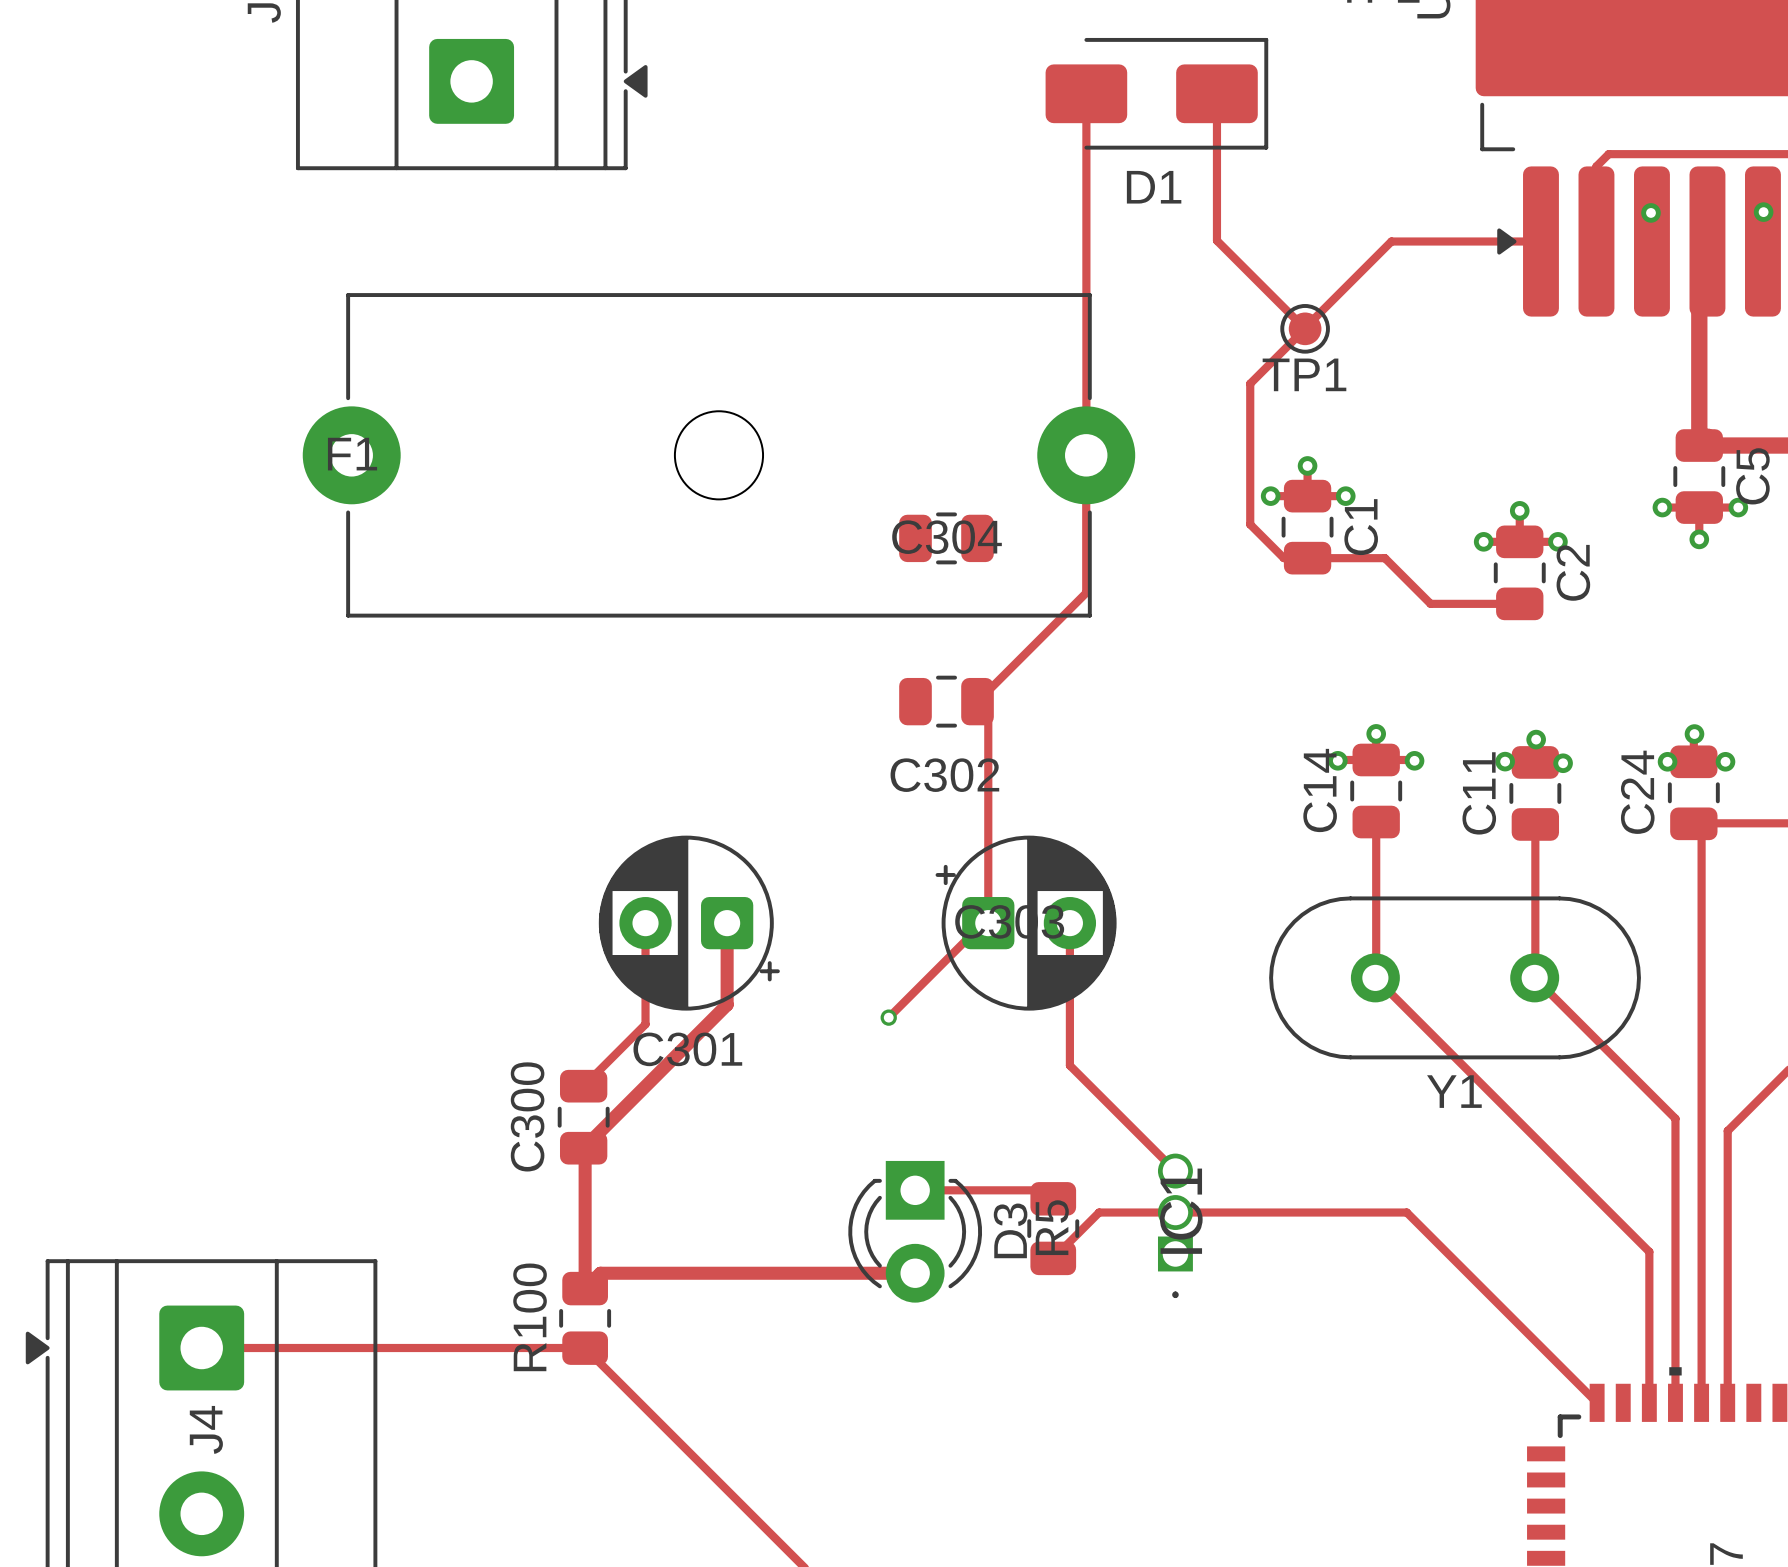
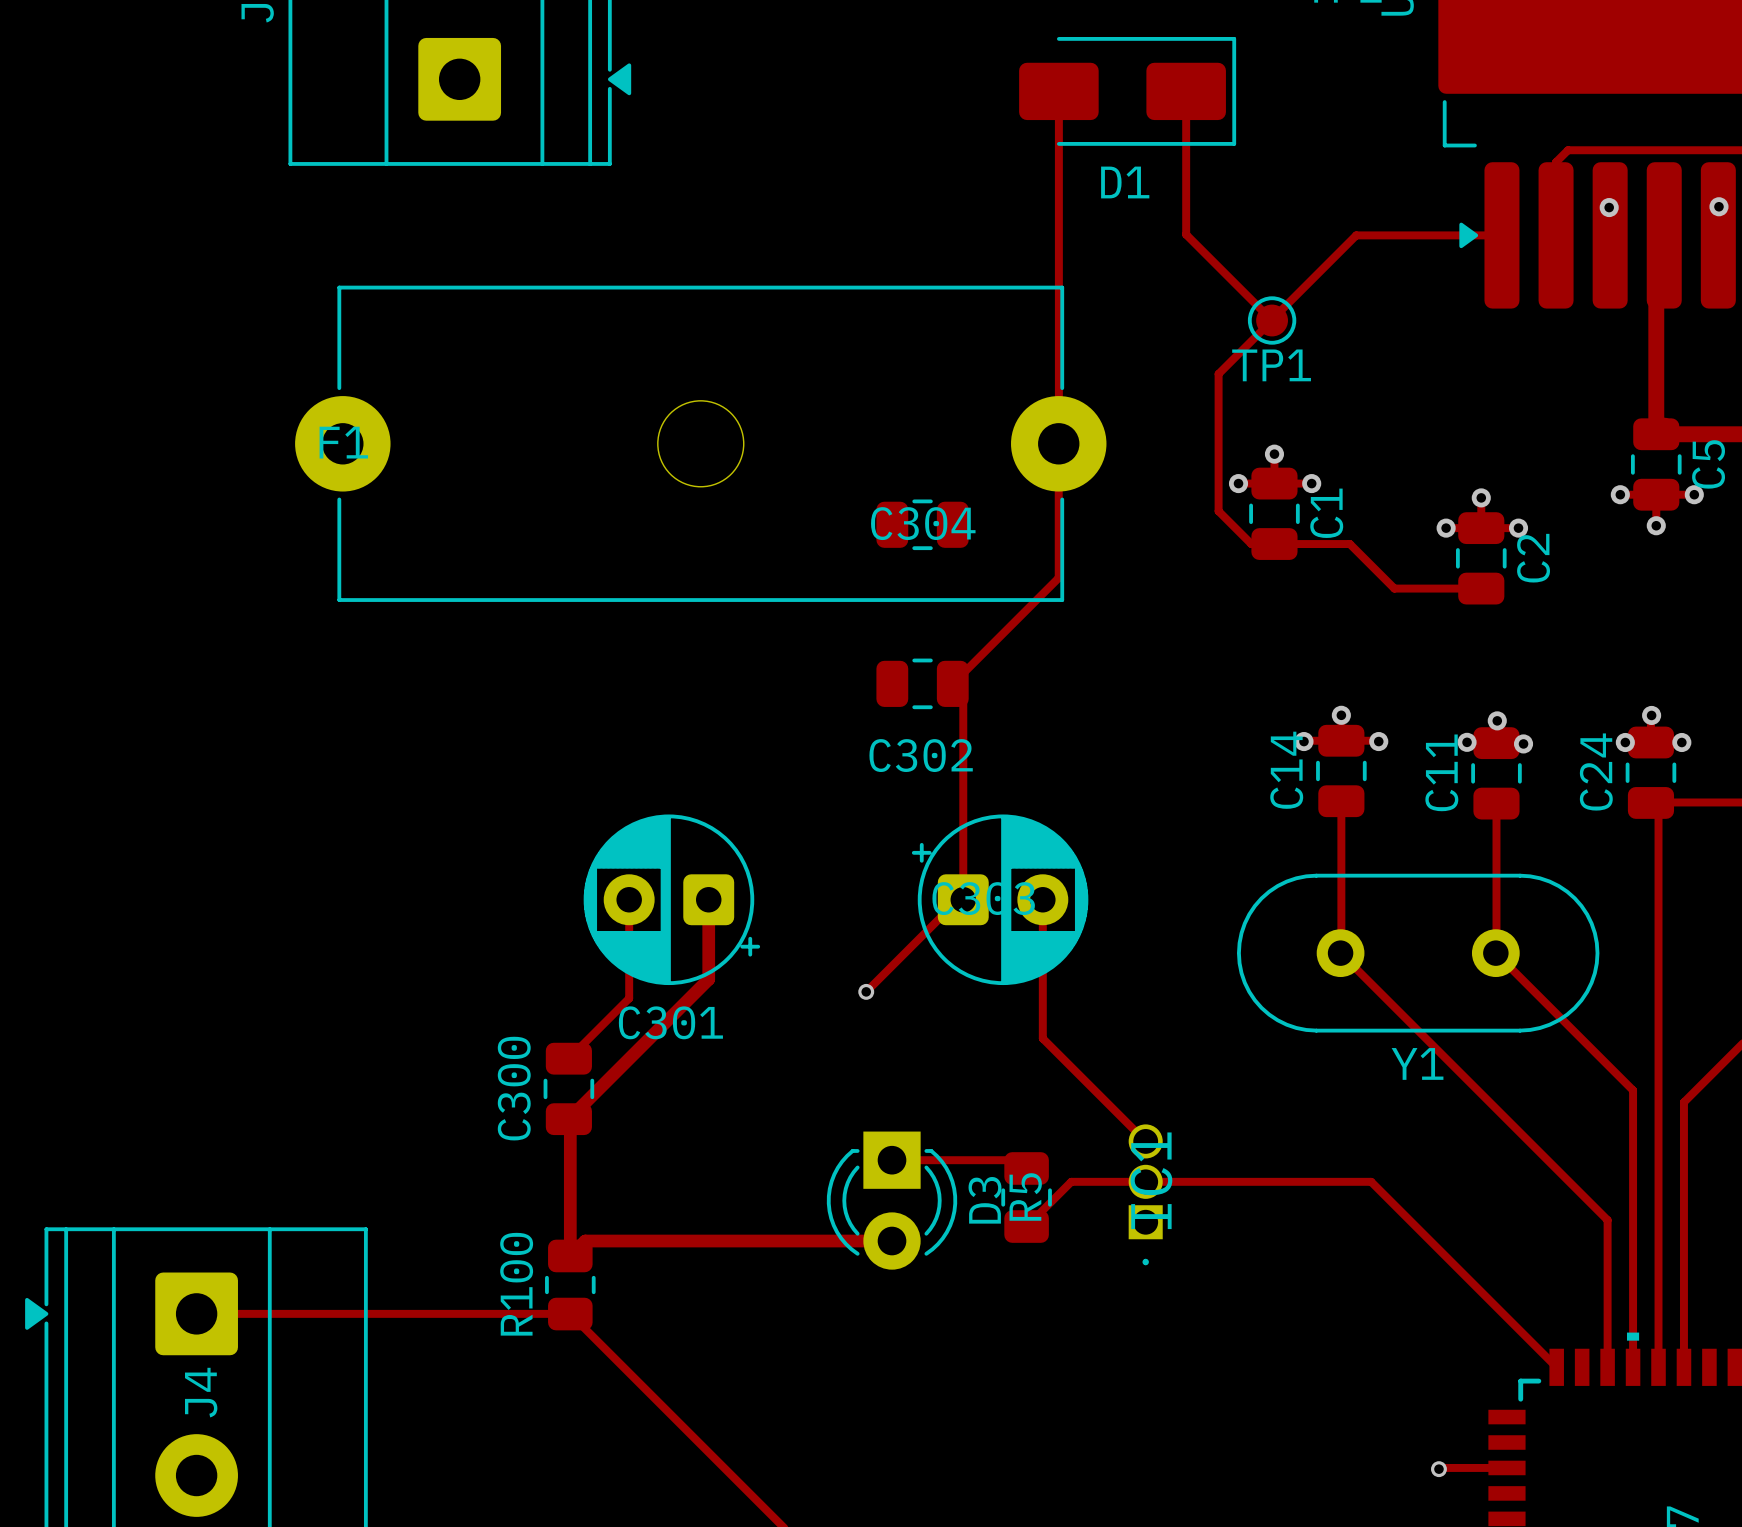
track: none -> (1506, 1467) (1438, 1469)
via: none -> (1438, 1469)

